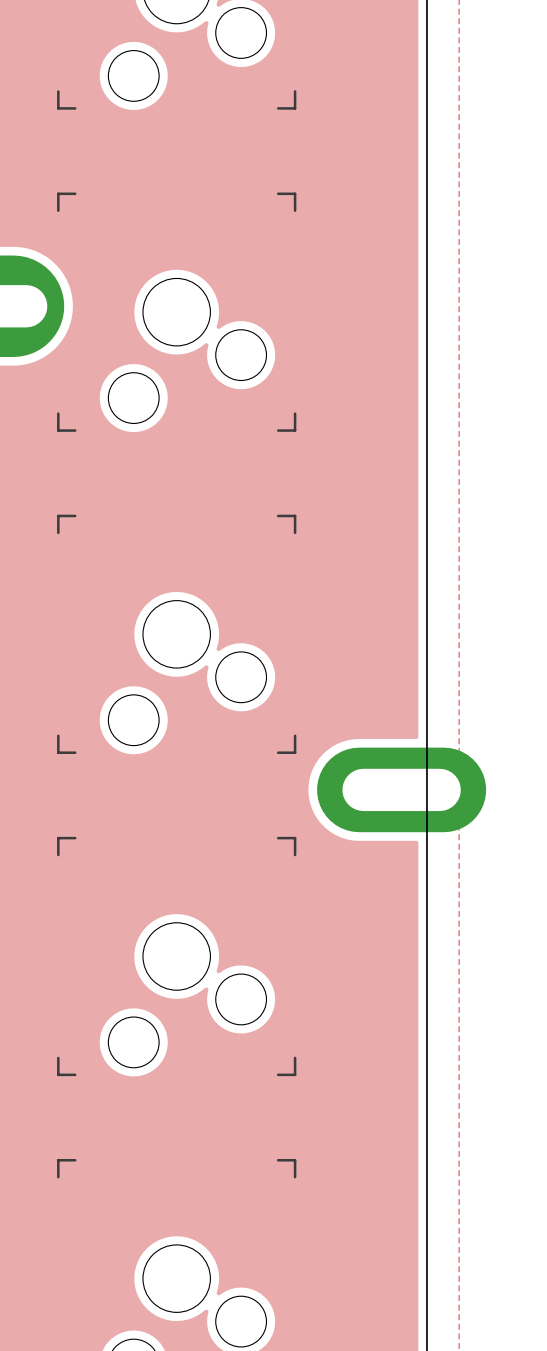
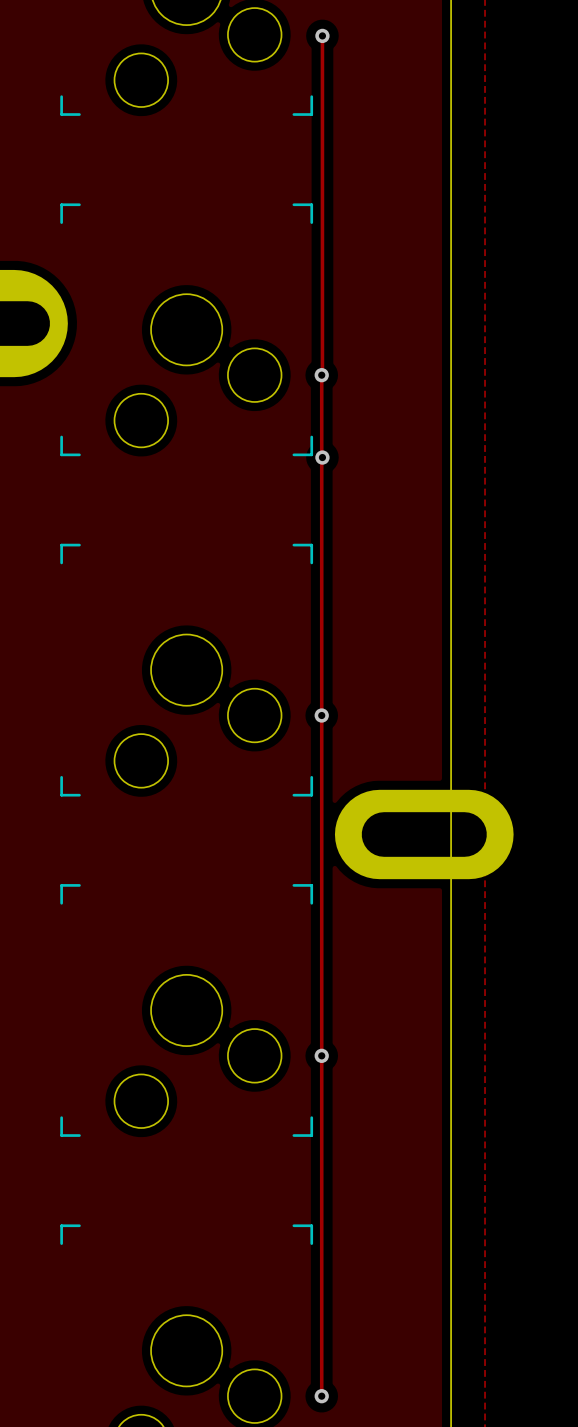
track: none -> (322, 35) (321, 1396)
via: none -> (322, 35)
via: none -> (321, 375)
via: none -> (322, 457)
via: none -> (321, 715)
via: none -> (321, 1055)
via: none -> (321, 1396)

